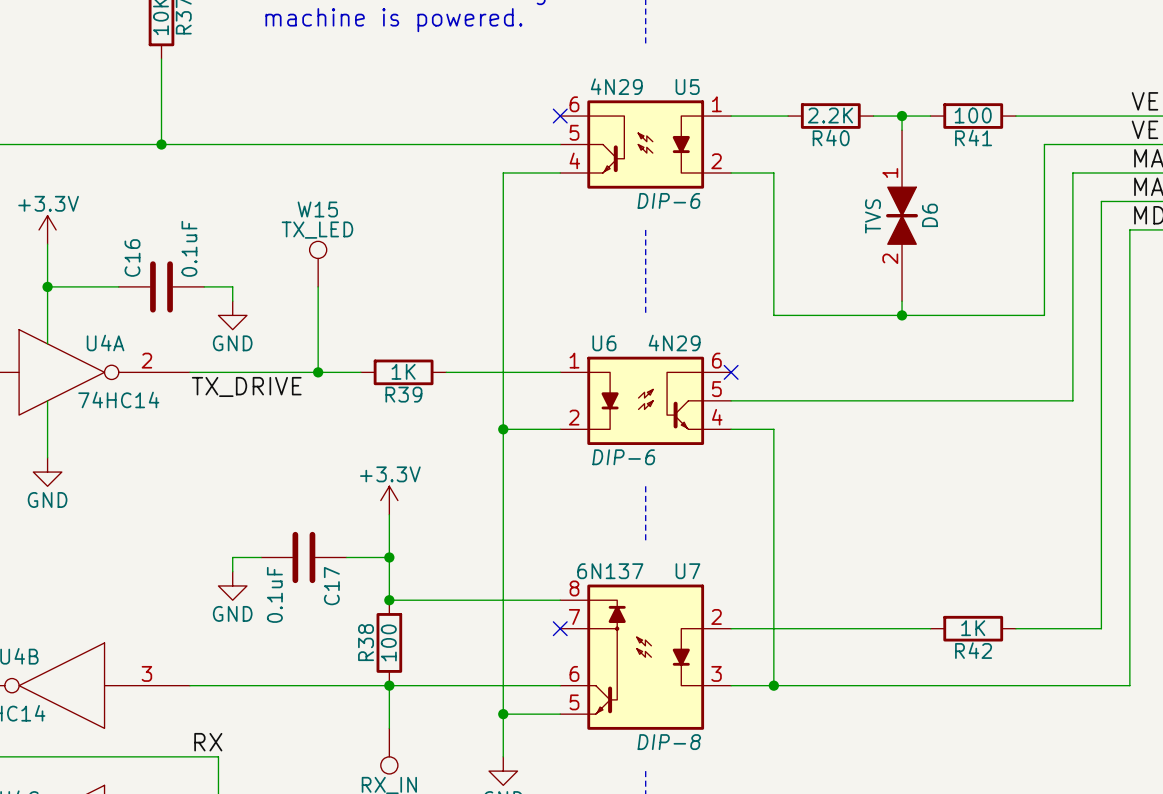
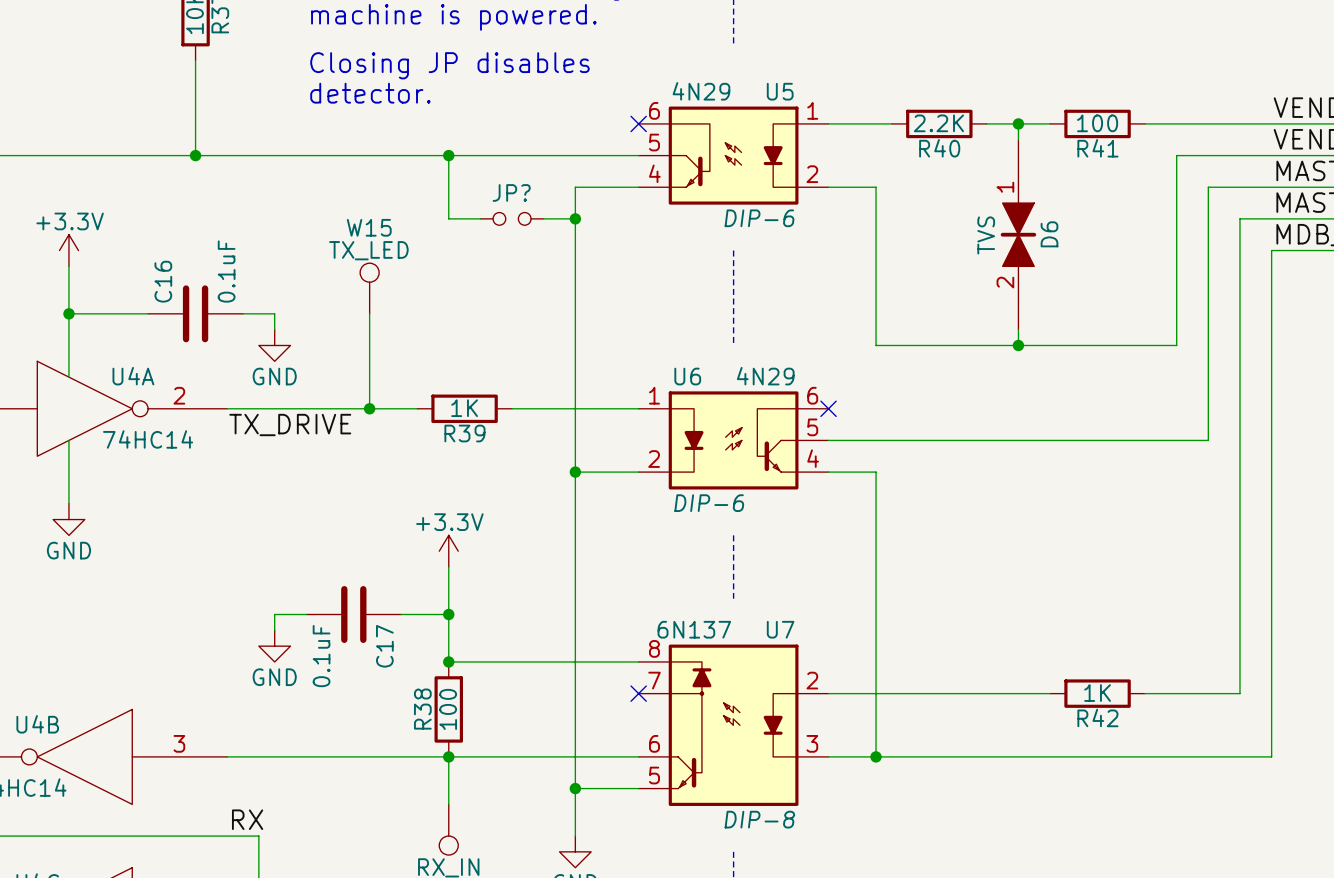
text: none -> Closing JP disables (450, 65)
text: none -> detector. (370, 93)
wire: none -> (448, 155) (448, 218) (480, 218)
junction: none -> (448, 155)
JP?: none -> (512, 218)
wire: none -> (543, 218) (575, 218)
junction: none -> (575, 218)

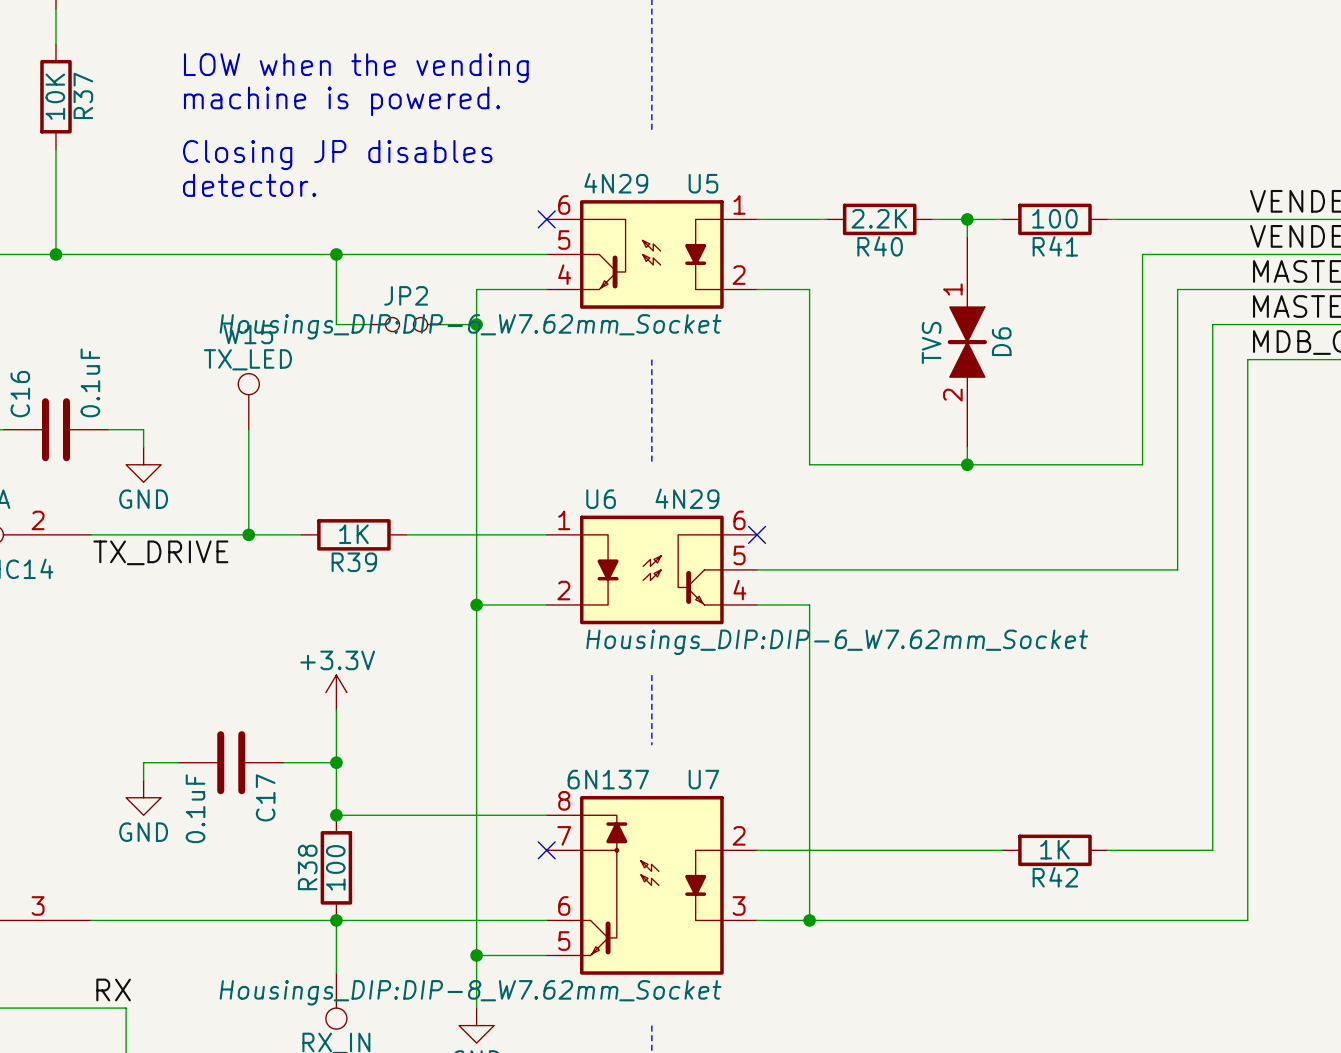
JP? name: JP? (511, 192) -> JP2 (406, 295)
U5 text: DIP-6 (759, 218) -> Housings_DIP:DIP-6_W7.62mm_Socket (470, 326)
U6 text: DIP-6 (709, 503) -> Housings_DIP:DIP-6_W7.62mm_Socket (837, 642)
U7 text: DIP-8 (759, 819) -> Housings_DIP:DIP-8_W7.62mm_Socket (470, 992)

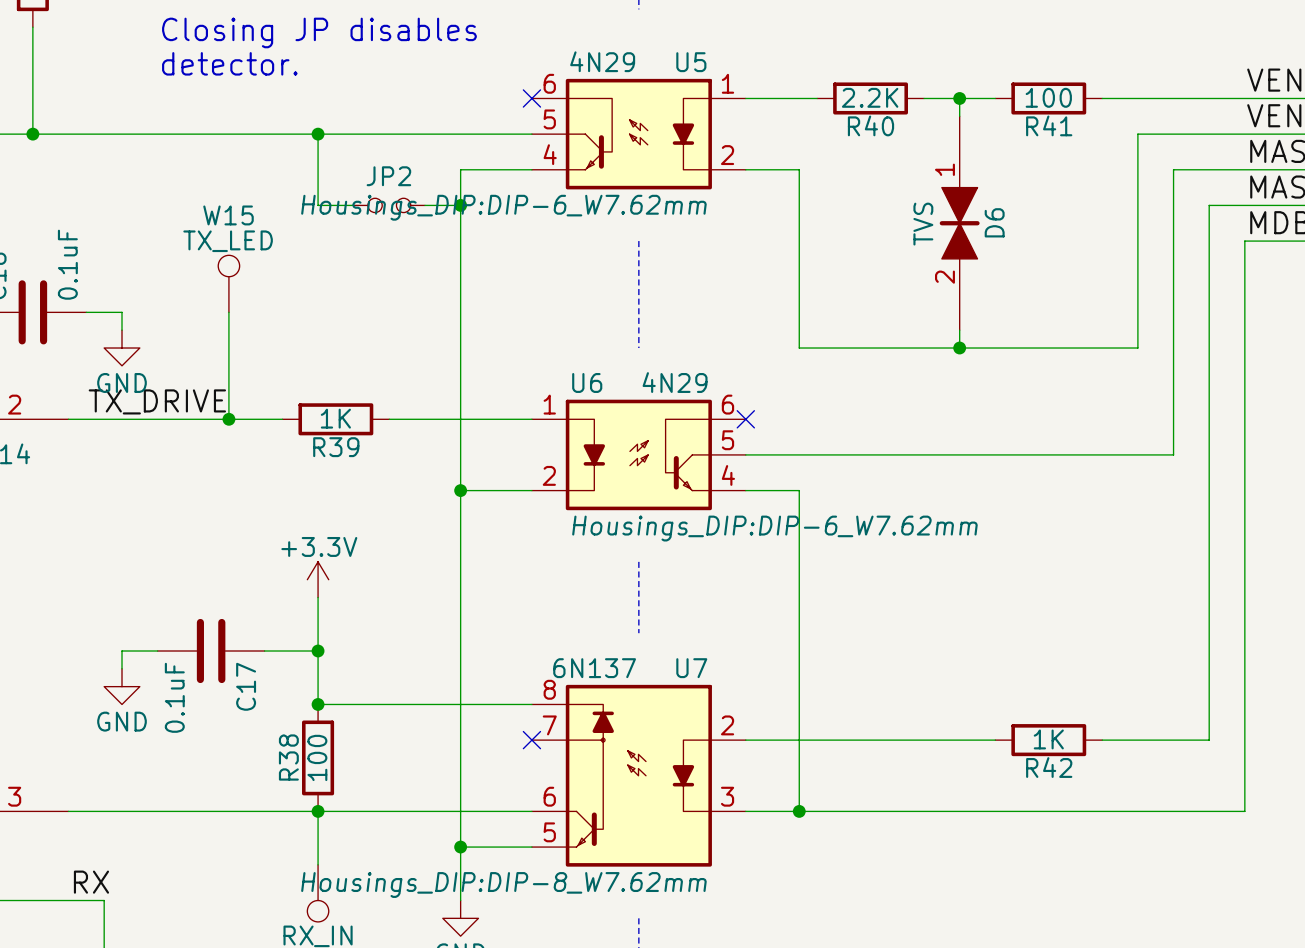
U5 text: Housings_DIP:DIP-6_W7.62mm_Socket (470, 326) -> Housings_DIP:DIP-6_W7.62mm (503, 207)
label position: TX_DRIVE (160, 552) -> TX_DRIVE (157, 401)
U6 text: Housings_DIP:DIP-6_W7.62mm_Socket (837, 642) -> Housings_DIP:DIP-6_W7.62mm (774, 528)
U7 text: Housings_DIP:DIP-8_W7.62mm_Socket (470, 992) -> Housings_DIP:DIP-8_W7.62mm (503, 885)

